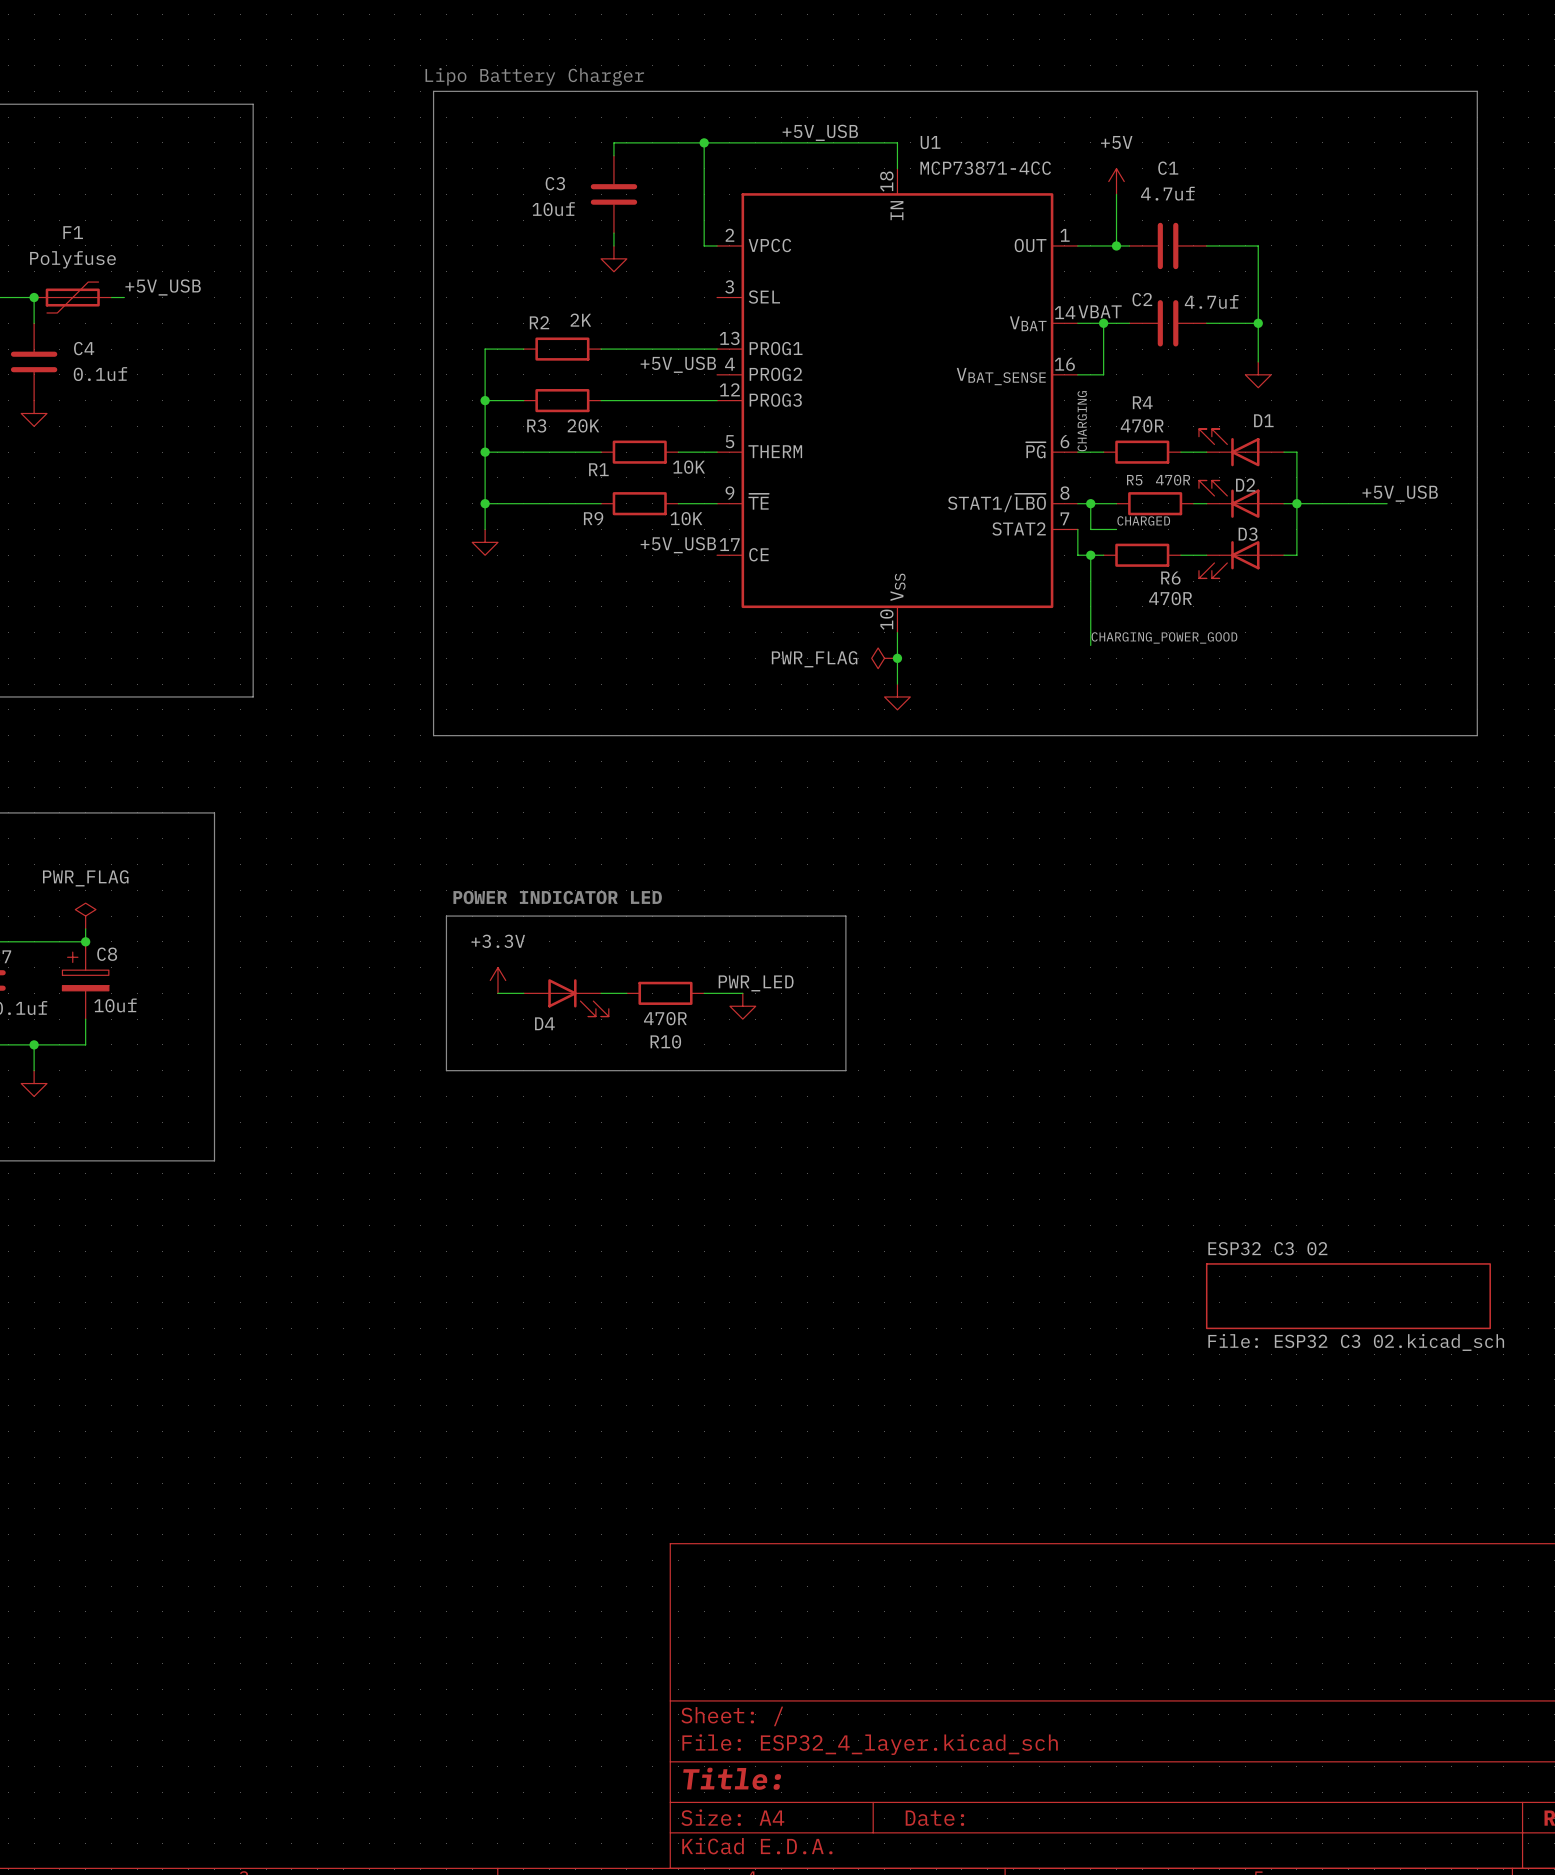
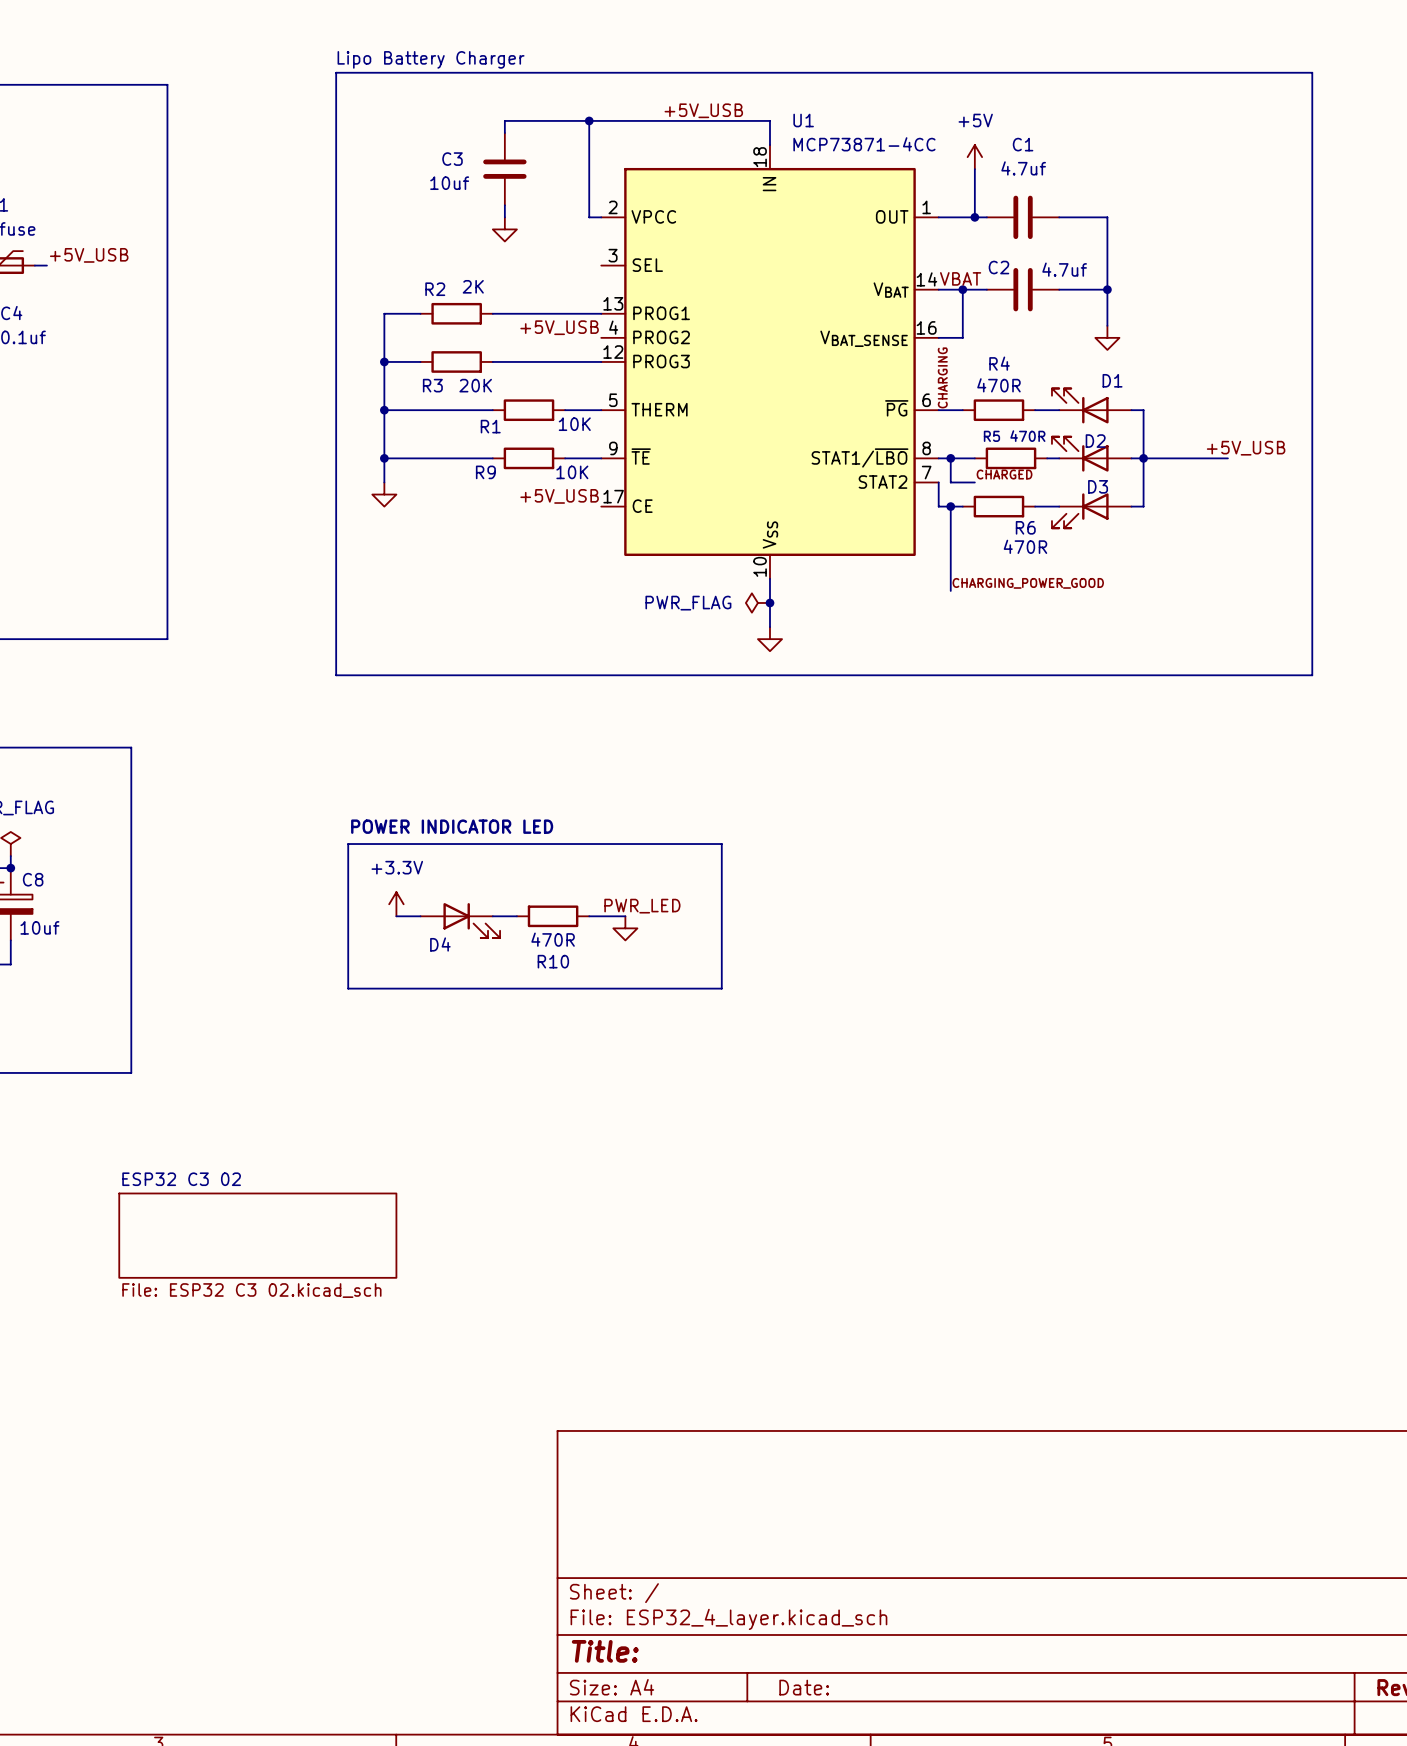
sheet ESP32 C3 02 shape: [1205, 1263, 1491, 1330] -> [118, 1192, 398, 1279]

